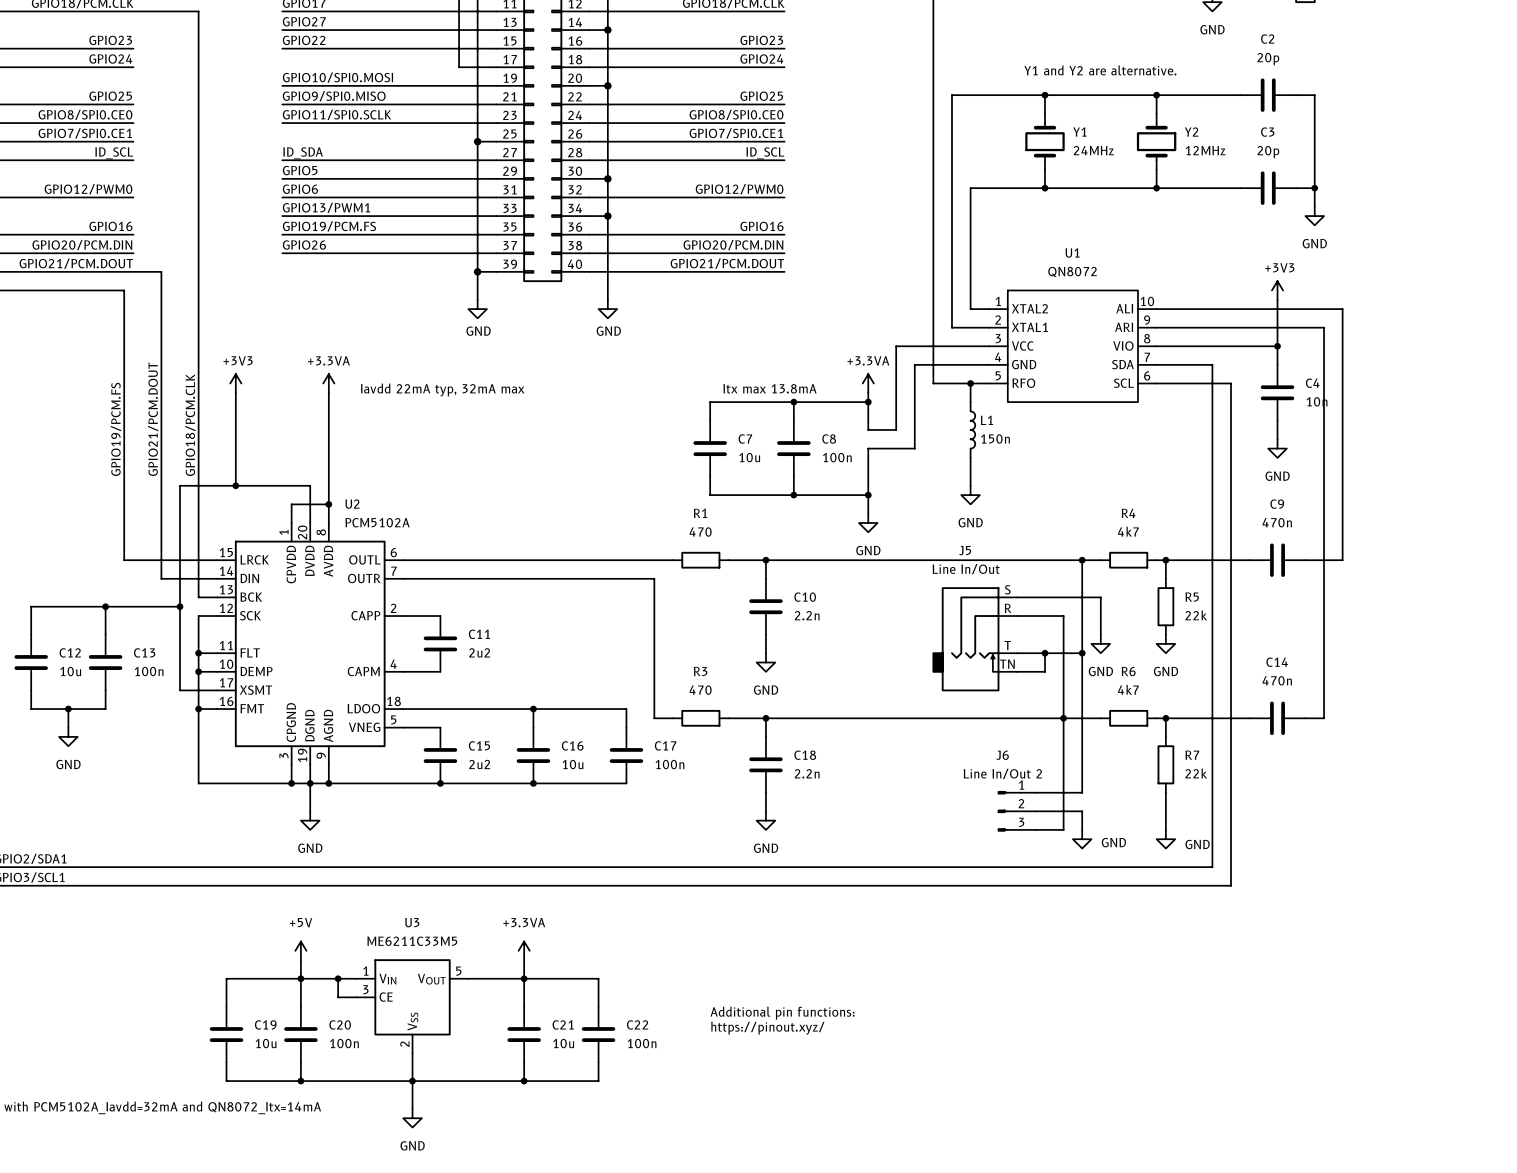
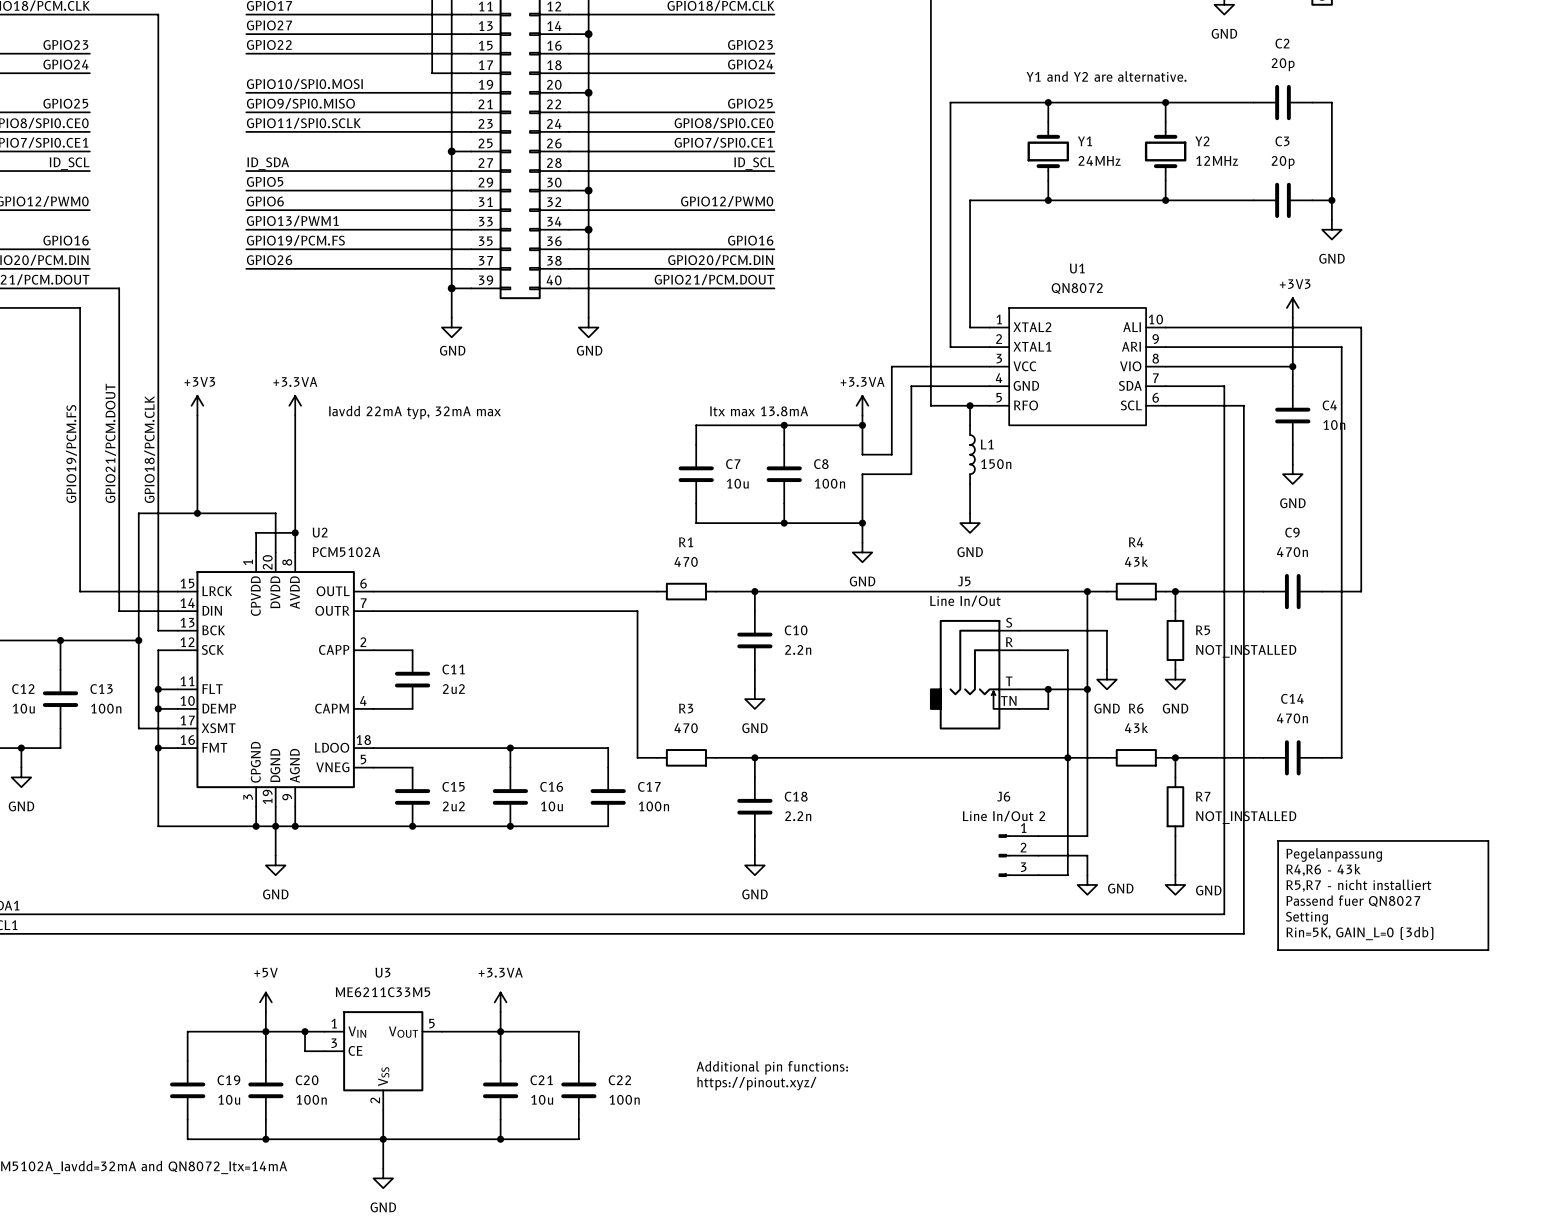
R4 value: 4k7 (1128, 531) -> 43k (1136, 561)
R5 value: 22k (1196, 615) -> NOT_INSTALLED (1246, 651)
R6 value: 4k7 (1128, 689) -> 43k (1136, 727)
R7 value: 22k (1196, 773) -> NOT_INSTALLED (1246, 817)
line: none -> (1278, 840) (1488, 840) (1488, 950) (1278, 950) (1278, 840)
text: none -> Pegelanpassung (1334, 854)
text: none -> R4,R6 - 43k (1323, 870)
text: none -> R5,R7 - nicht installiert (1358, 885)
text: none -> Passend fuer QN8027 (1353, 901)
text: none -> Setting (1306, 918)
text: none -> Rin=5K, GAIN_L=0 (3db) (1359, 933)

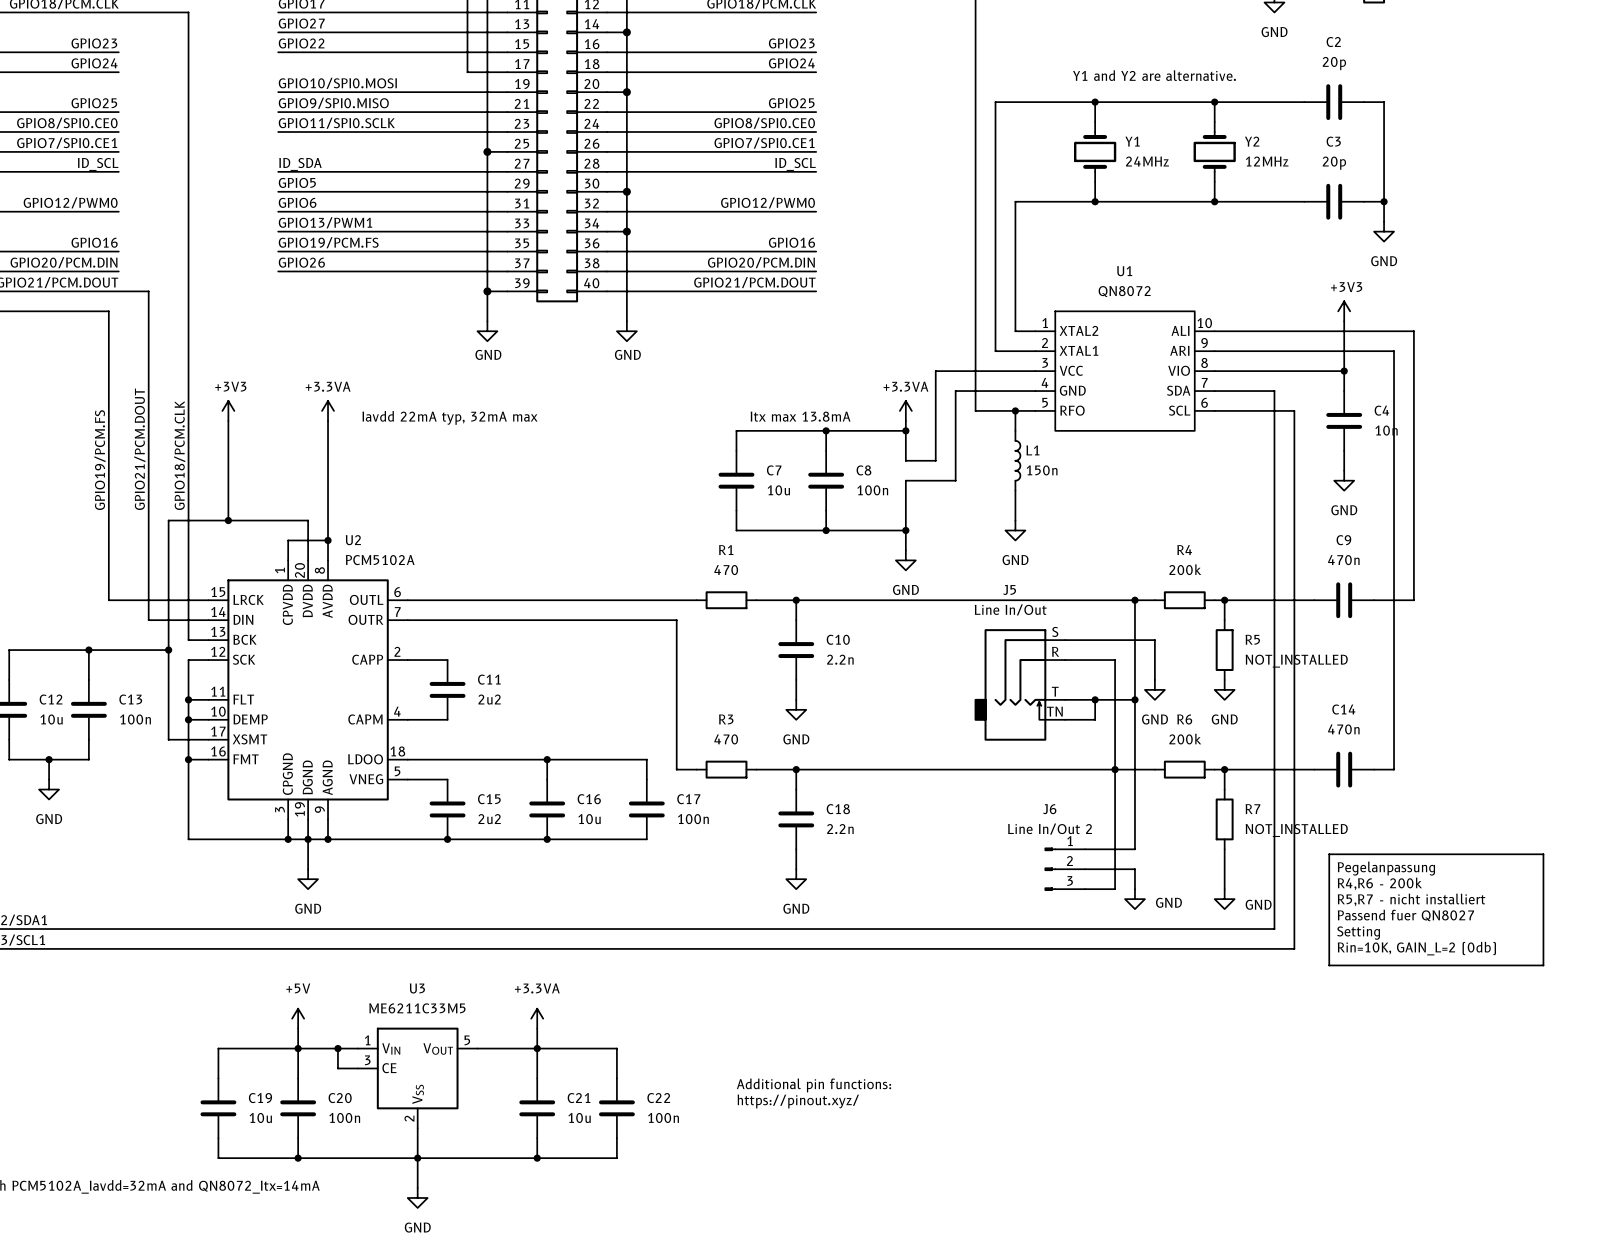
R4 value: 43k (1136, 561) -> 200k (1185, 569)
R6 value: 43k (1136, 727) -> 200k (1185, 739)
text: R4,R6 - 43k (1323, 870) -> R4,R6 - 200k (1379, 883)
text: Rin=5K, GAIN_L=0 (3db) (1359, 933) -> Rin=10K, GAIN_L=2 (0db) (1416, 948)

